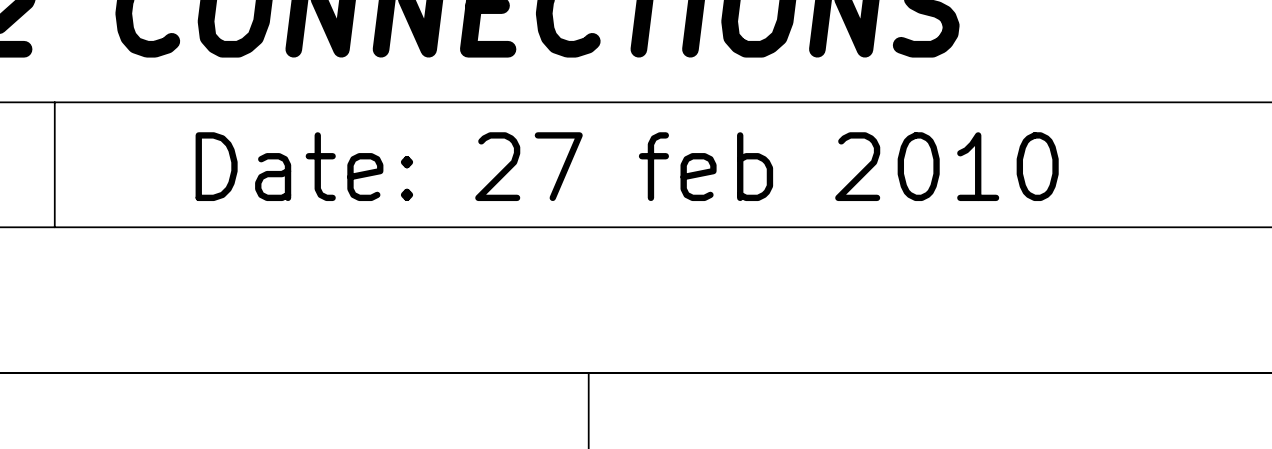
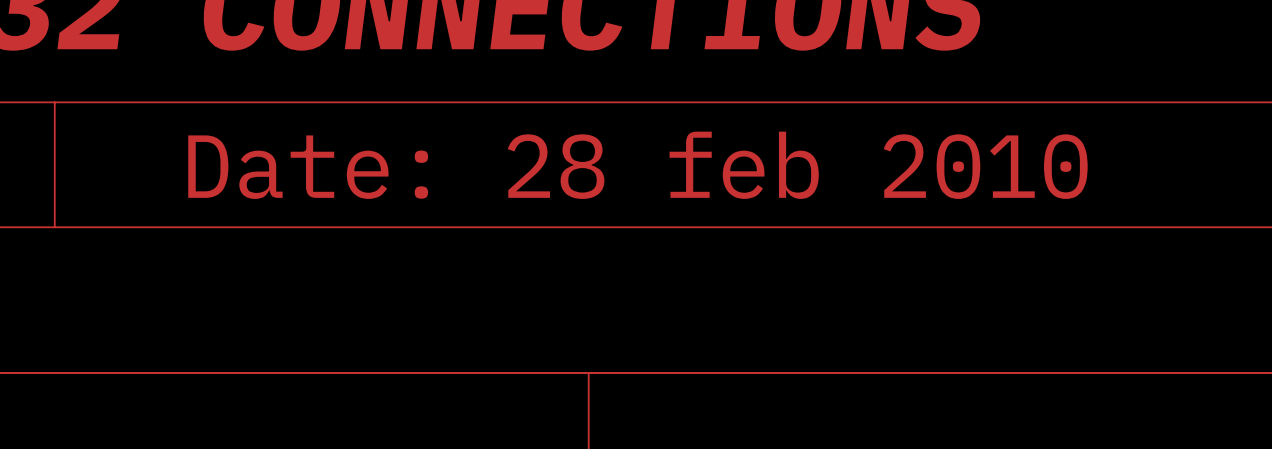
title block: Date: 27 feb 2010 (627, 166) -> Date: 28 feb 2010 (637, 165)

